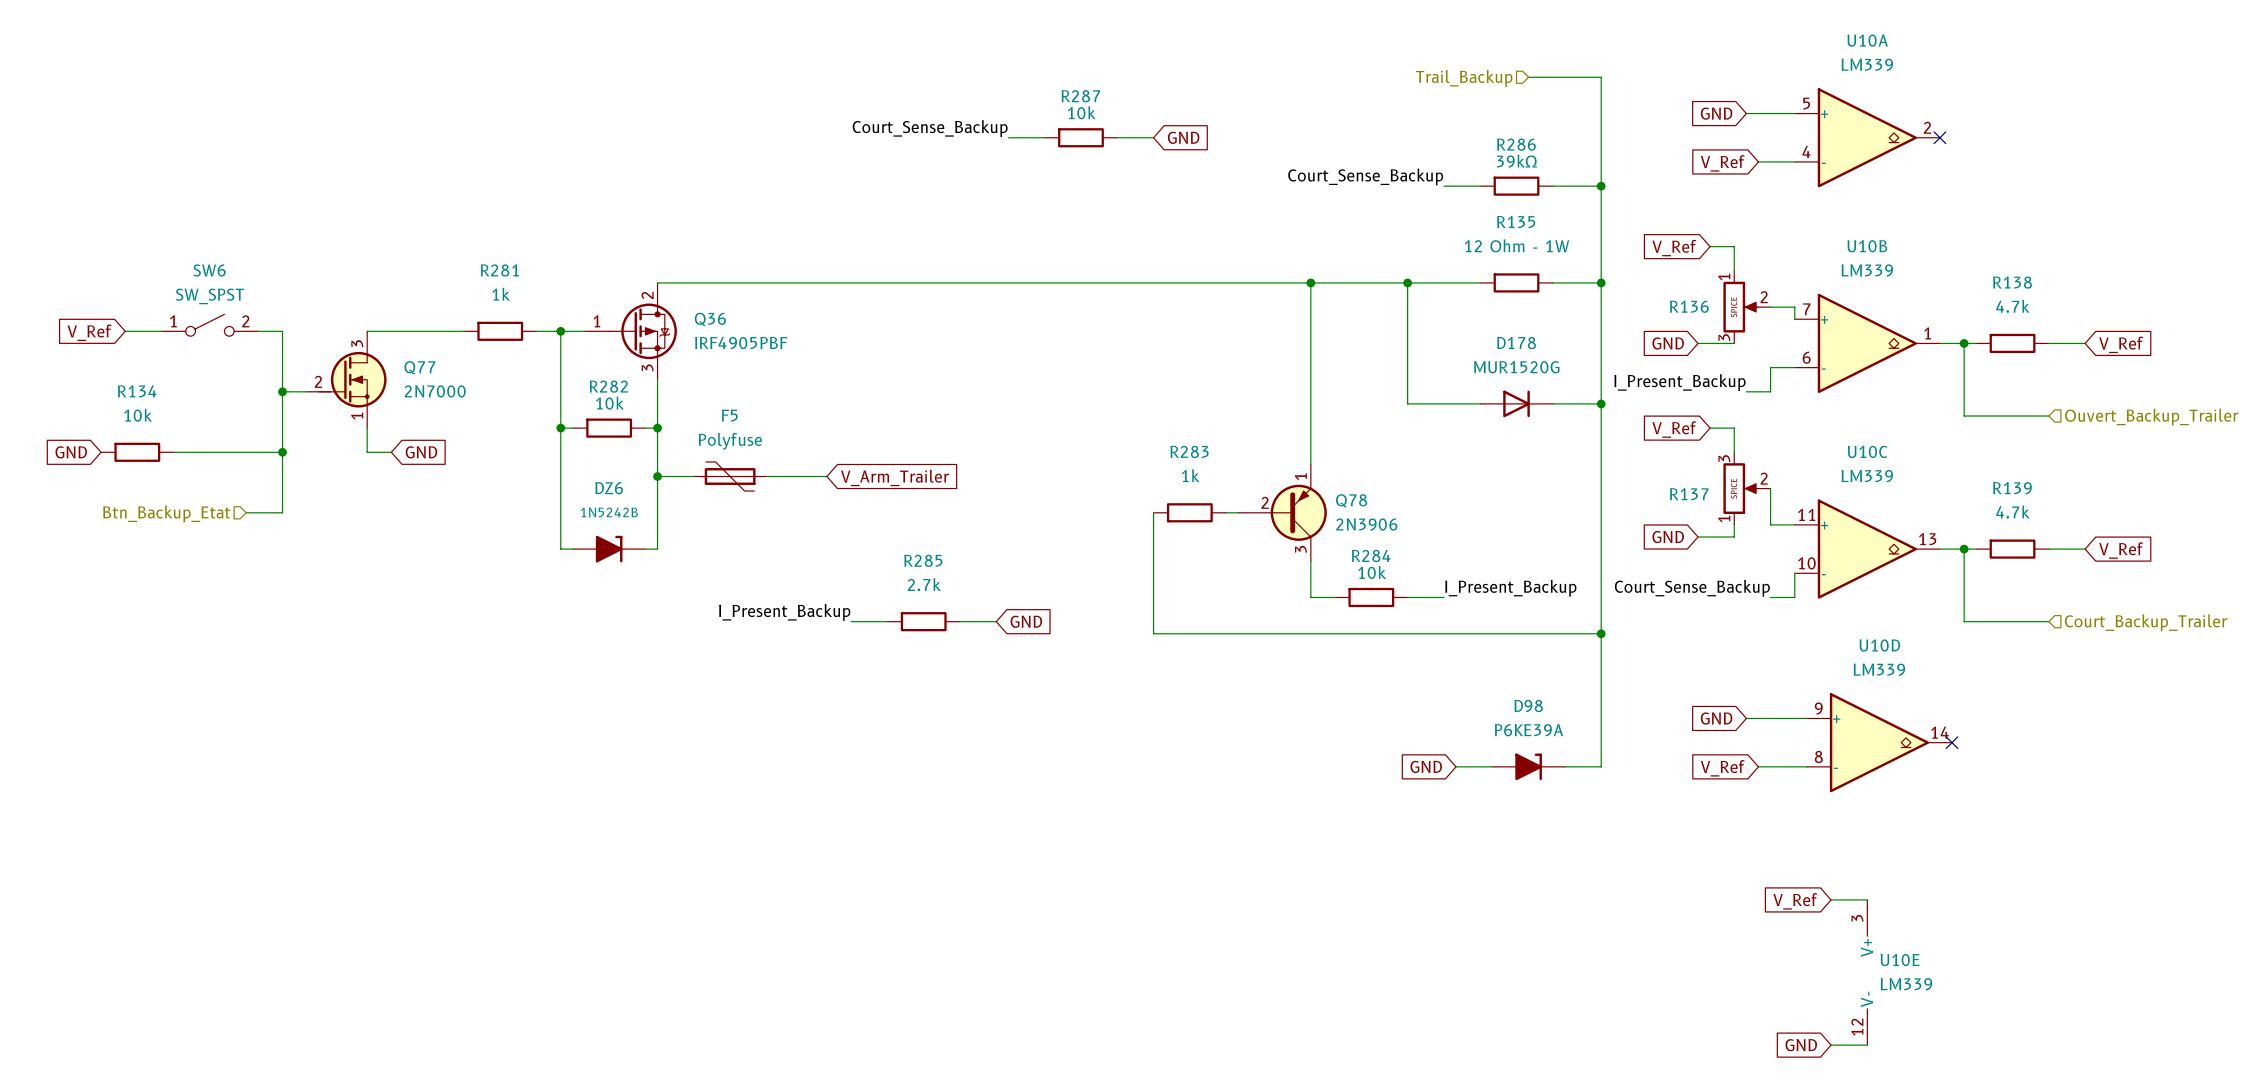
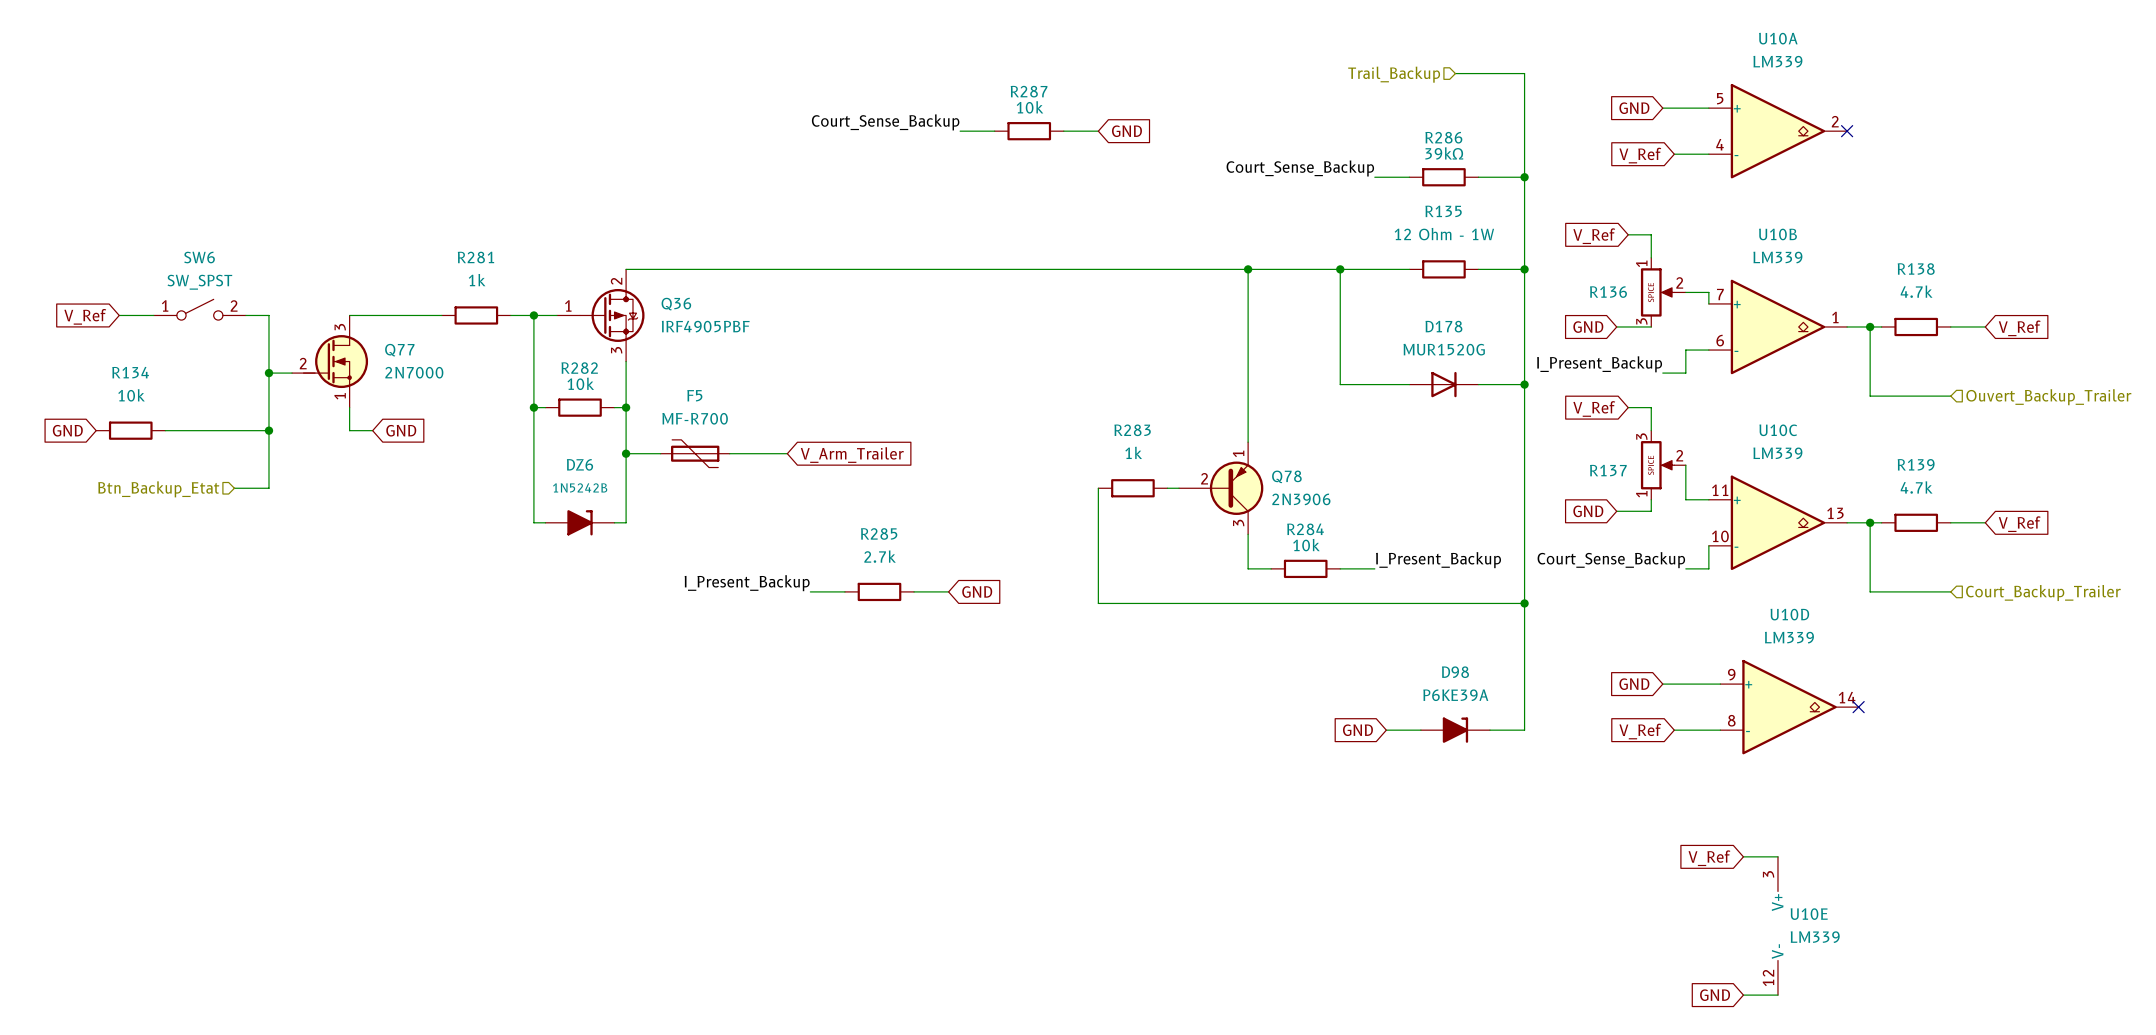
F5 value: Polyfuse (730, 441) -> MF-R700 (695, 418)

